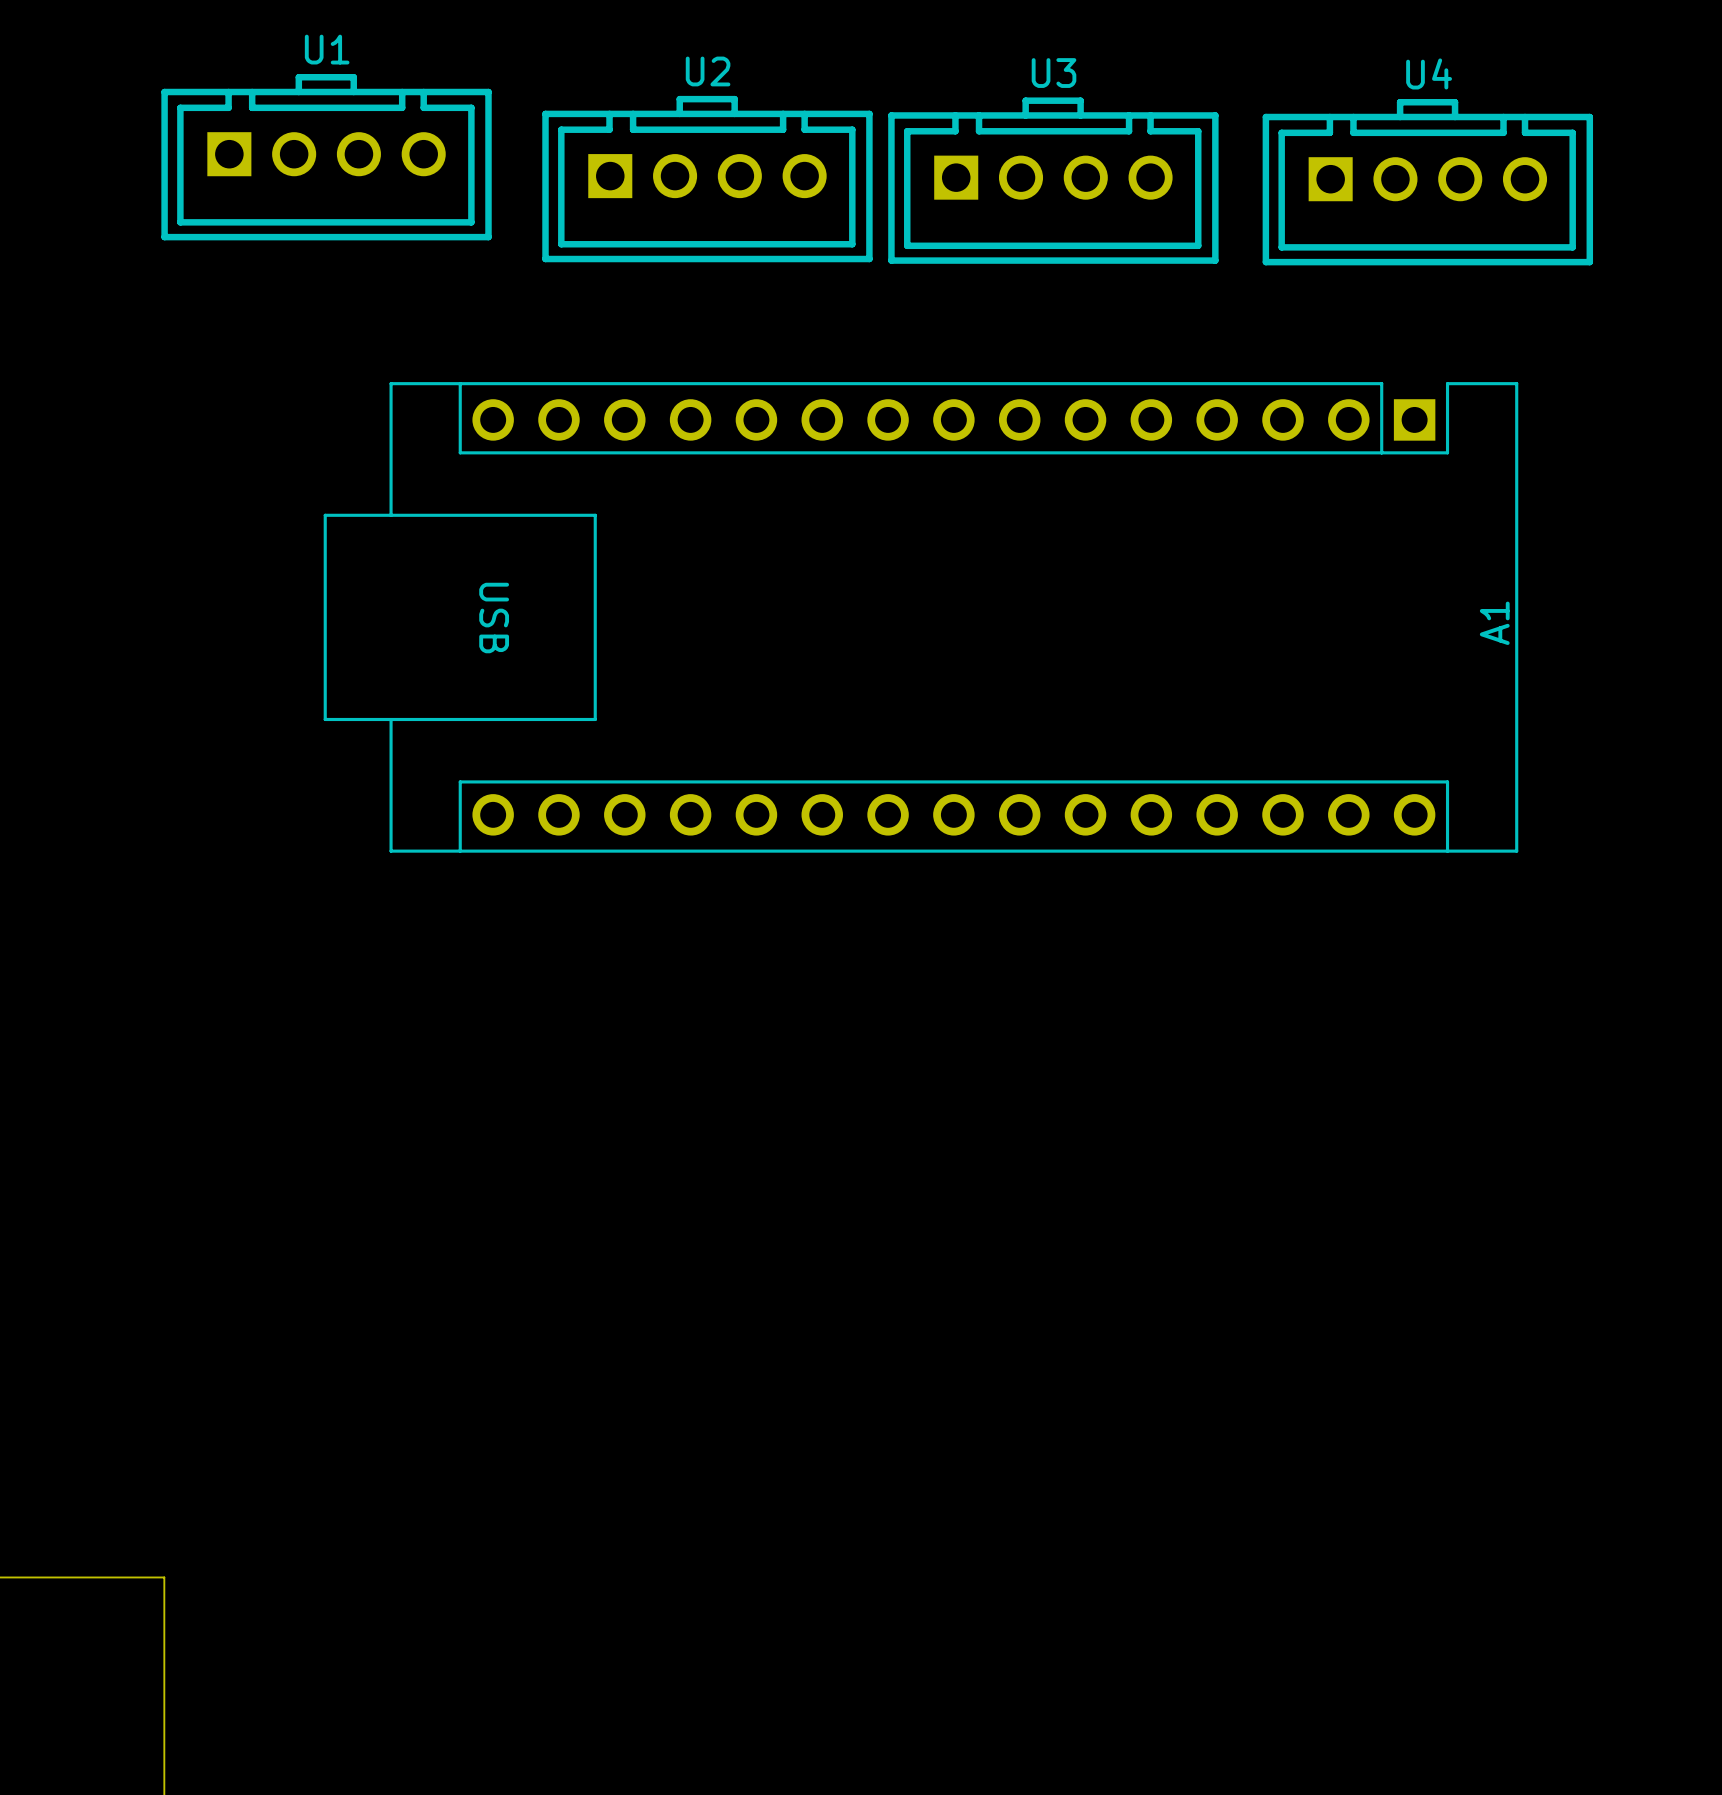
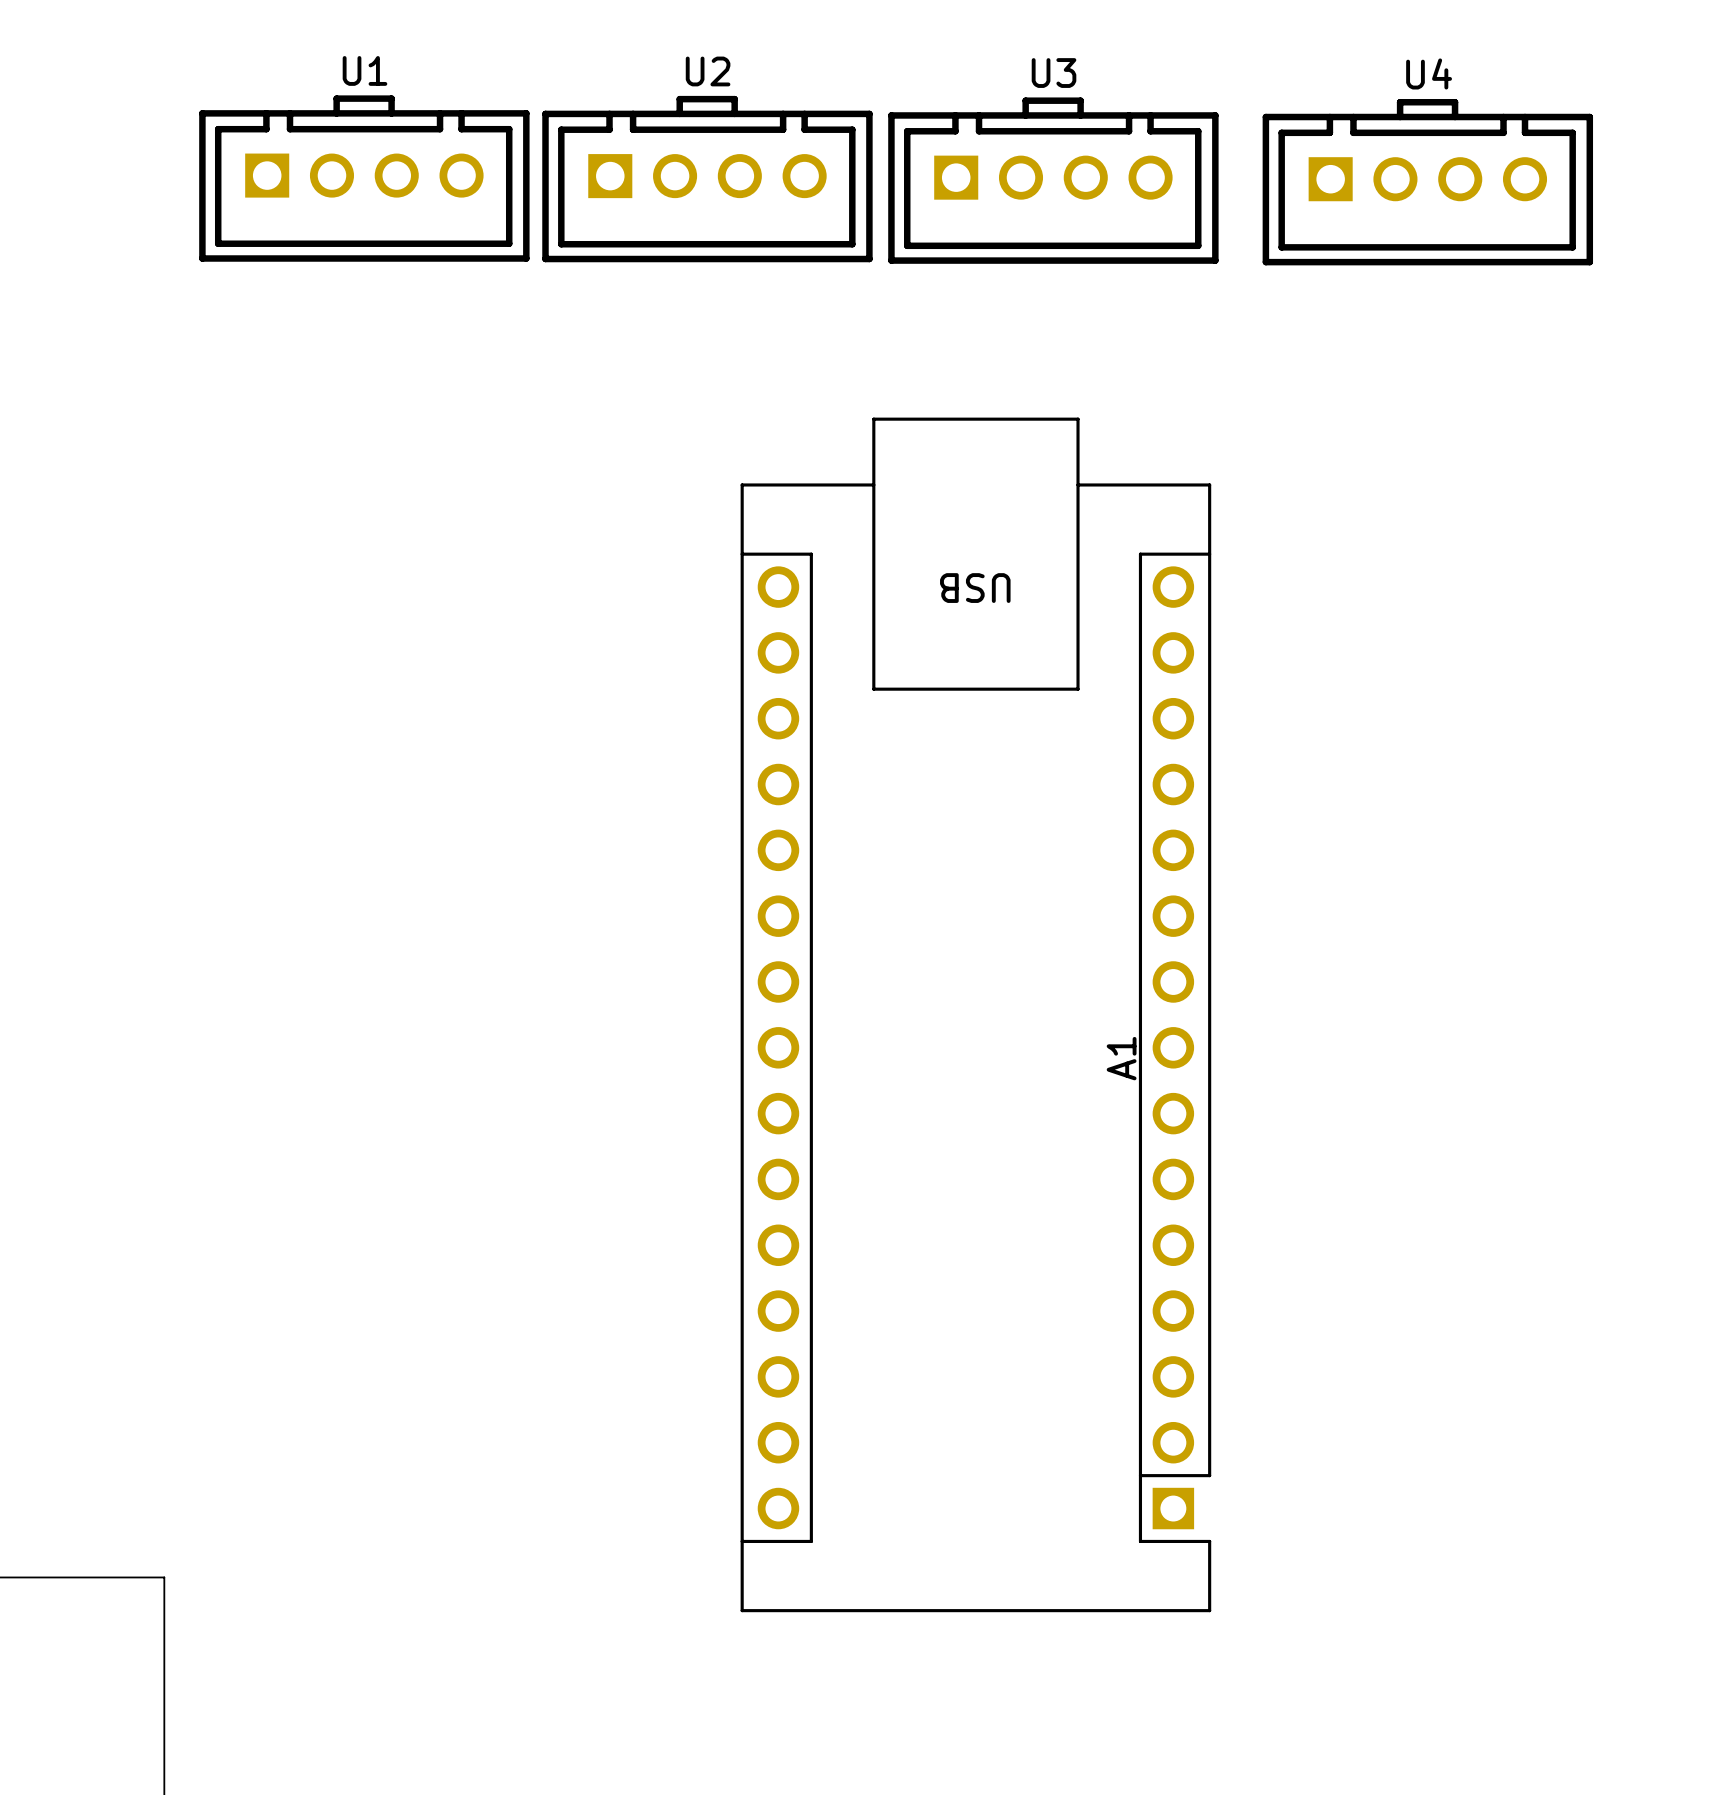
U1 position: (326, 157) -> (364, 178)
A1 rotation: 0° (920, 617) -> 90° clockwise (975, 1014)
A1 name position: A1 (1494, 623) -> A1 (1121, 1058)

